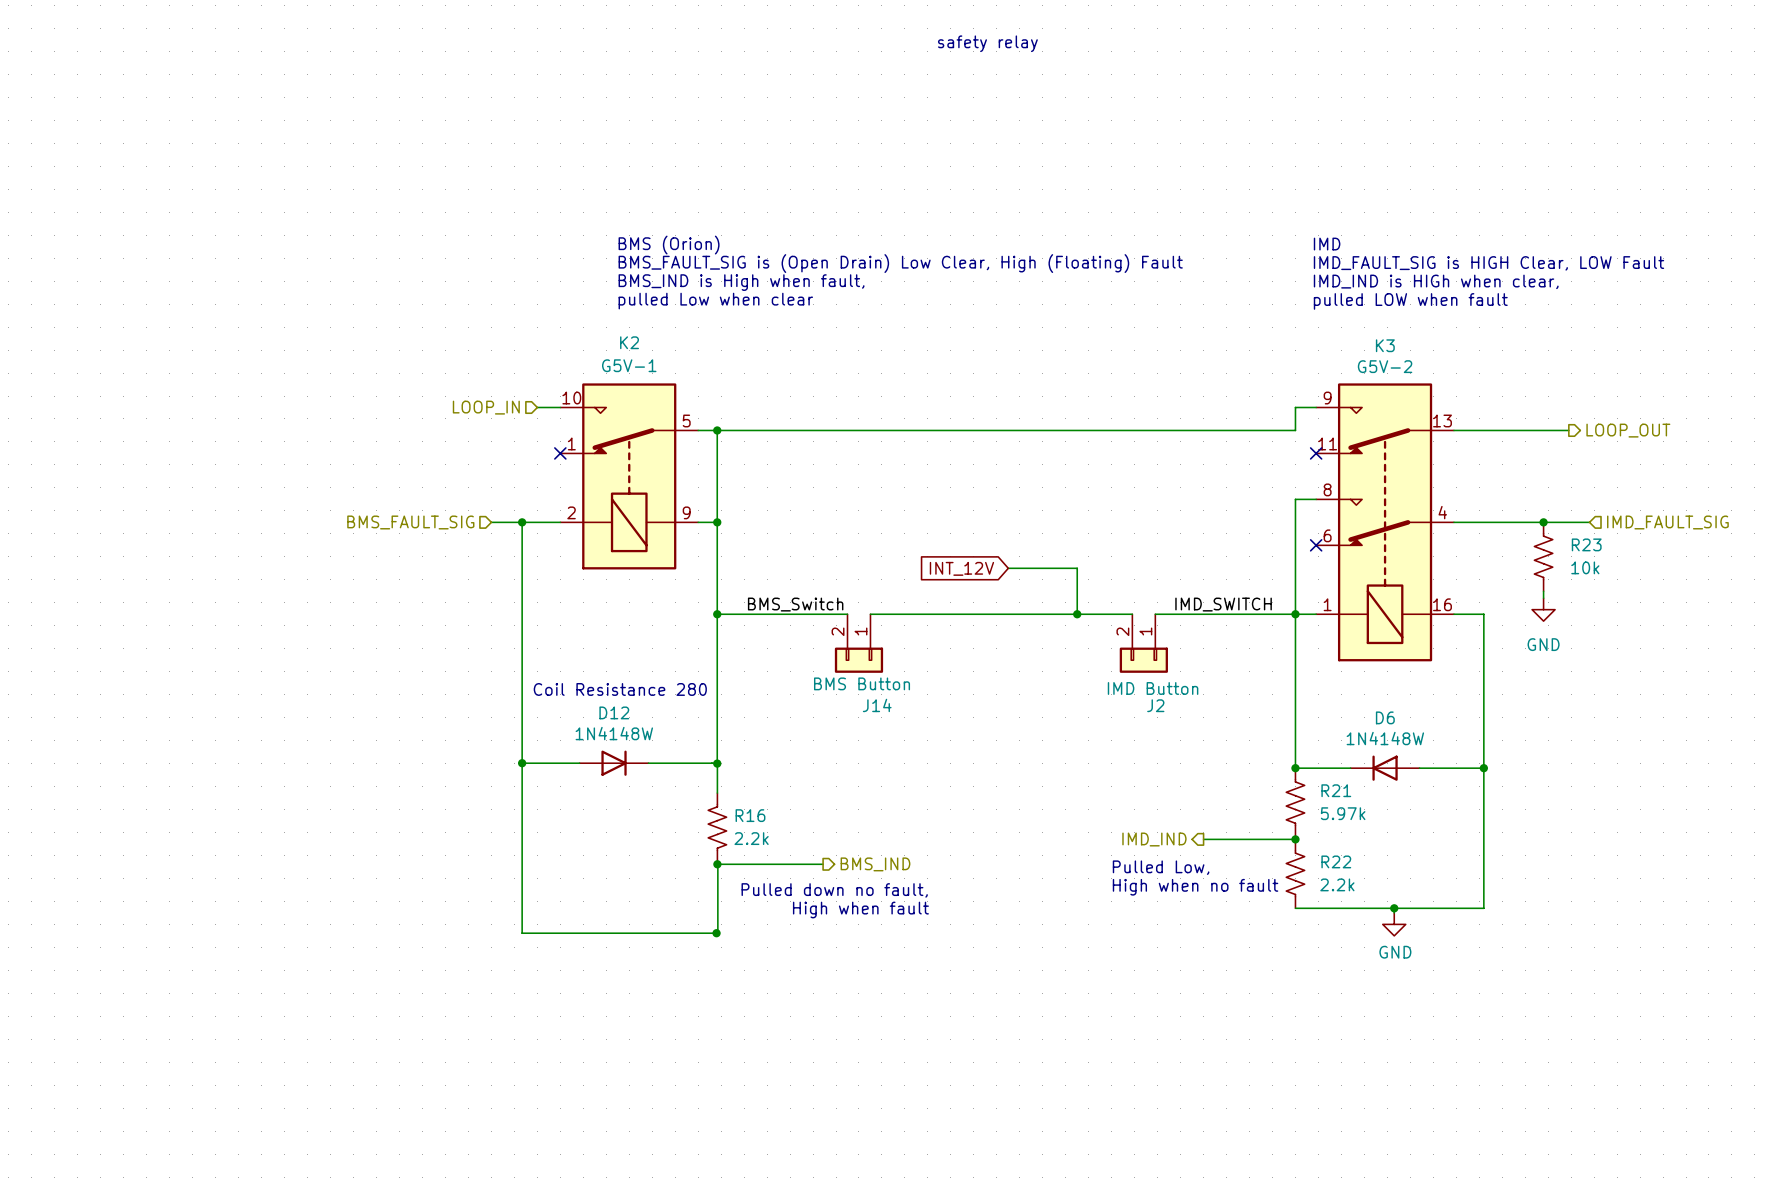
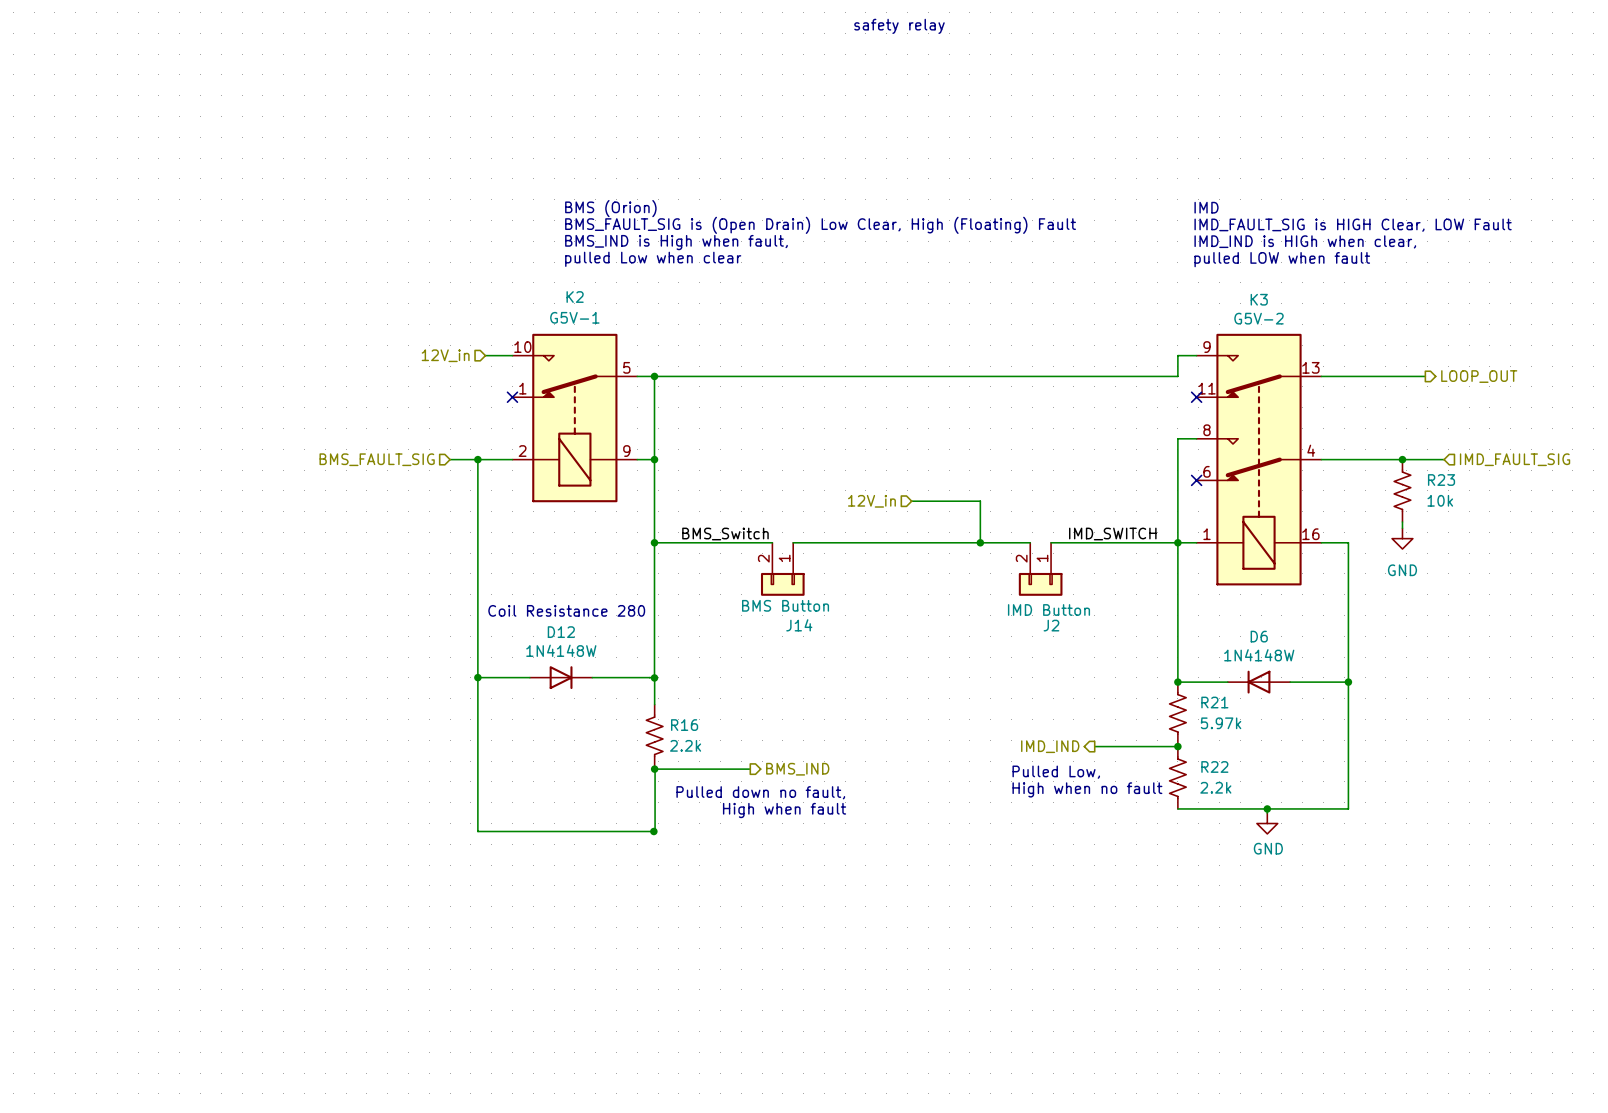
hierarchical label: LOOP_IN (486, 407) -> 12V_in (445, 355)
wire: none -> (485, 355) (491, 355)
hierarchical label: none -> 12V_in (871, 501)
global label: INT_12V (961, 568) -> none
wire: none -> (911, 501) (917, 501)

